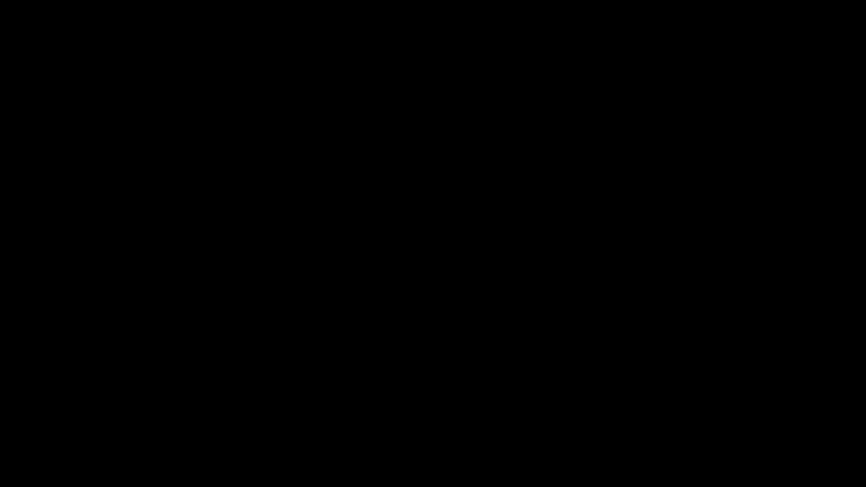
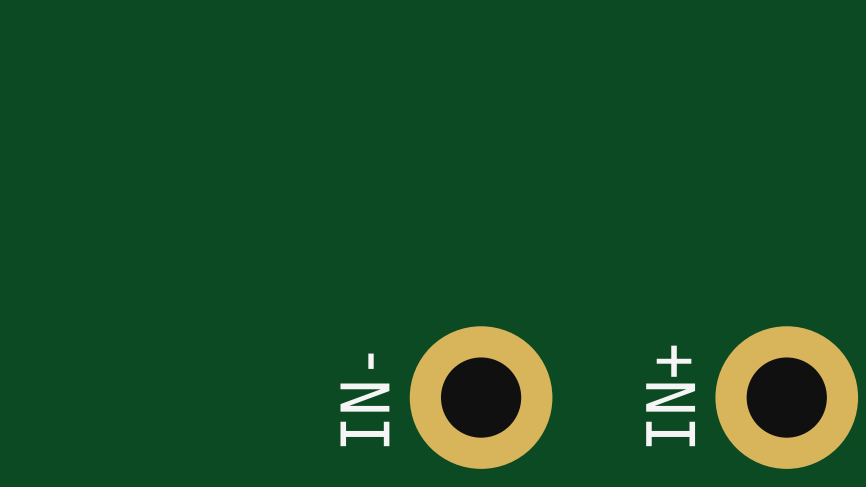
IN-: none -> (481, 397)
IN+: none -> (786, 397)

